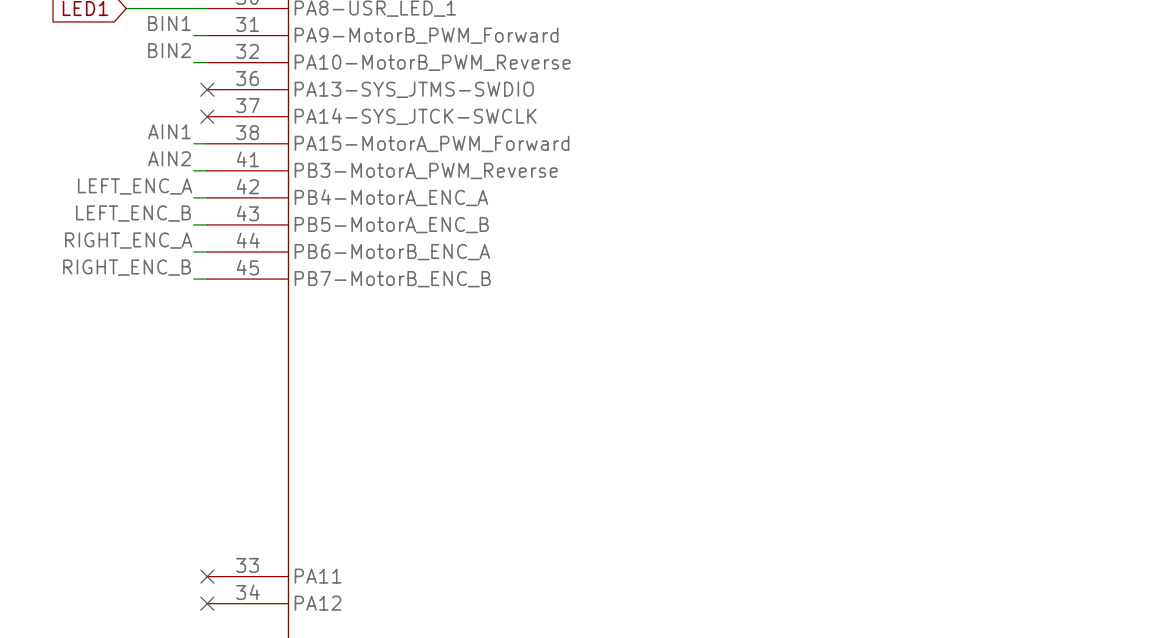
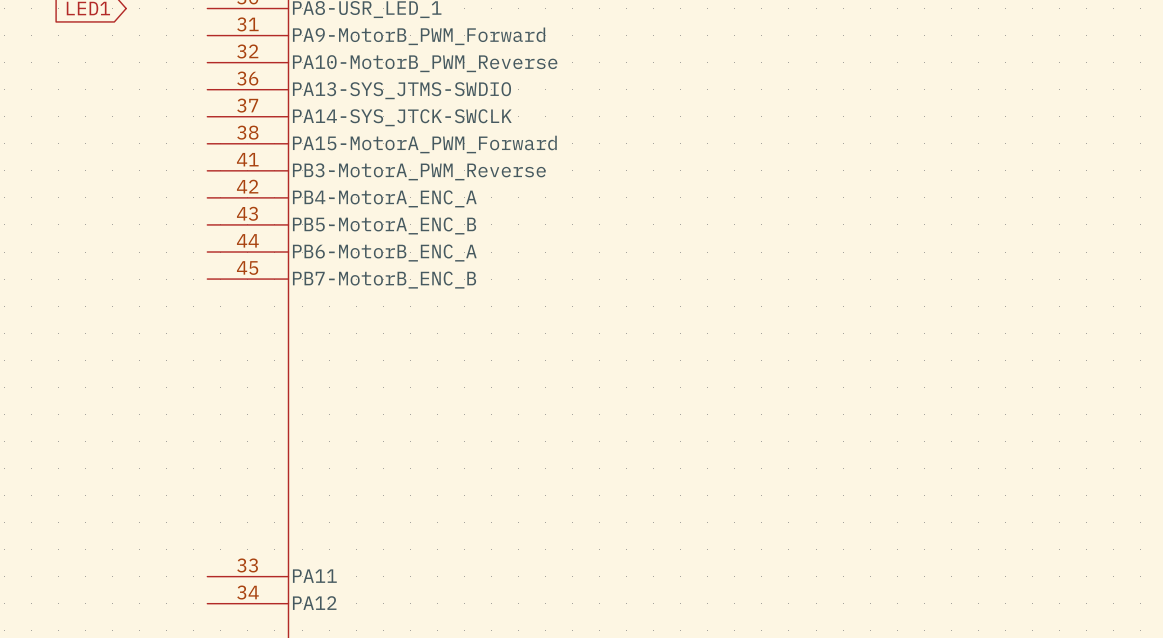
wire: (126, 8) (207, 8) -> none
label: BIN1 (169, 23) -> none
wire: (193, 35) (207, 35) -> none
label: BIN2 (169, 50) -> none
wire: (193, 62) (207, 62) -> none
no-connect mark: (207, 89) -> none
no-connect mark: (207, 116) -> none
label: AIN1 (169, 131) -> none
wire: (193, 143) (207, 143) -> none
label: AIN2 (169, 158) -> none
wire: (193, 170) (207, 170) -> none
label: LEFT_ENC_A (135, 186) -> none
wire: (193, 197) (207, 197) -> none
label: LEFT_ENC_B (133, 213) -> none
wire: (193, 224) (207, 224) -> none
label: RIGHT_ENC_A (128, 240) -> none
wire: (193, 252) (207, 252) -> none
label: RIGHT_ENC_B (127, 267) -> none
wire: (193, 279) (207, 279) -> none
no-connect mark: (207, 576) -> none
no-connect mark: (207, 603) -> none

